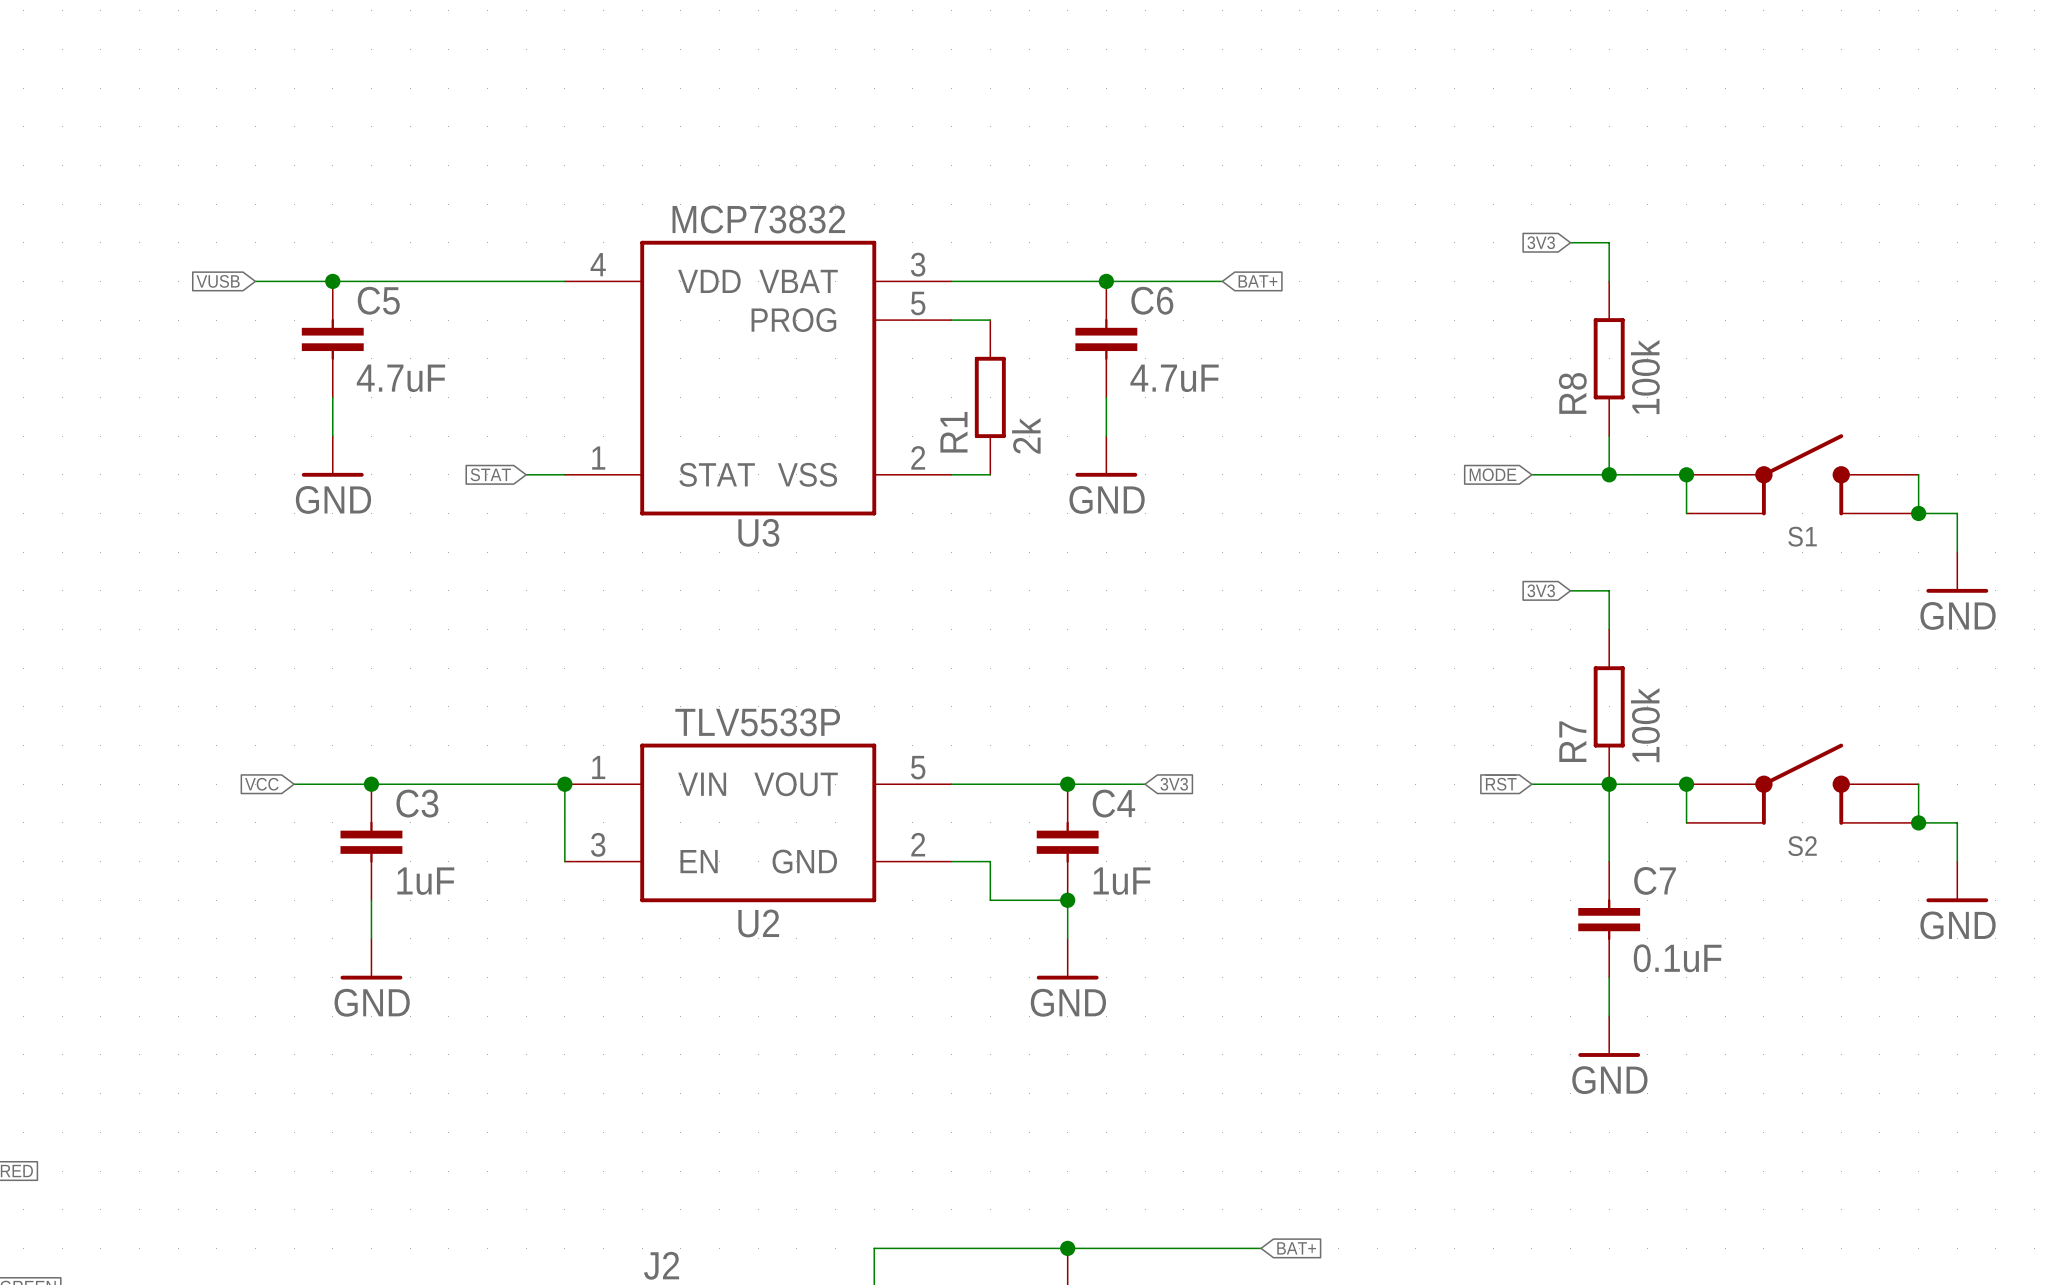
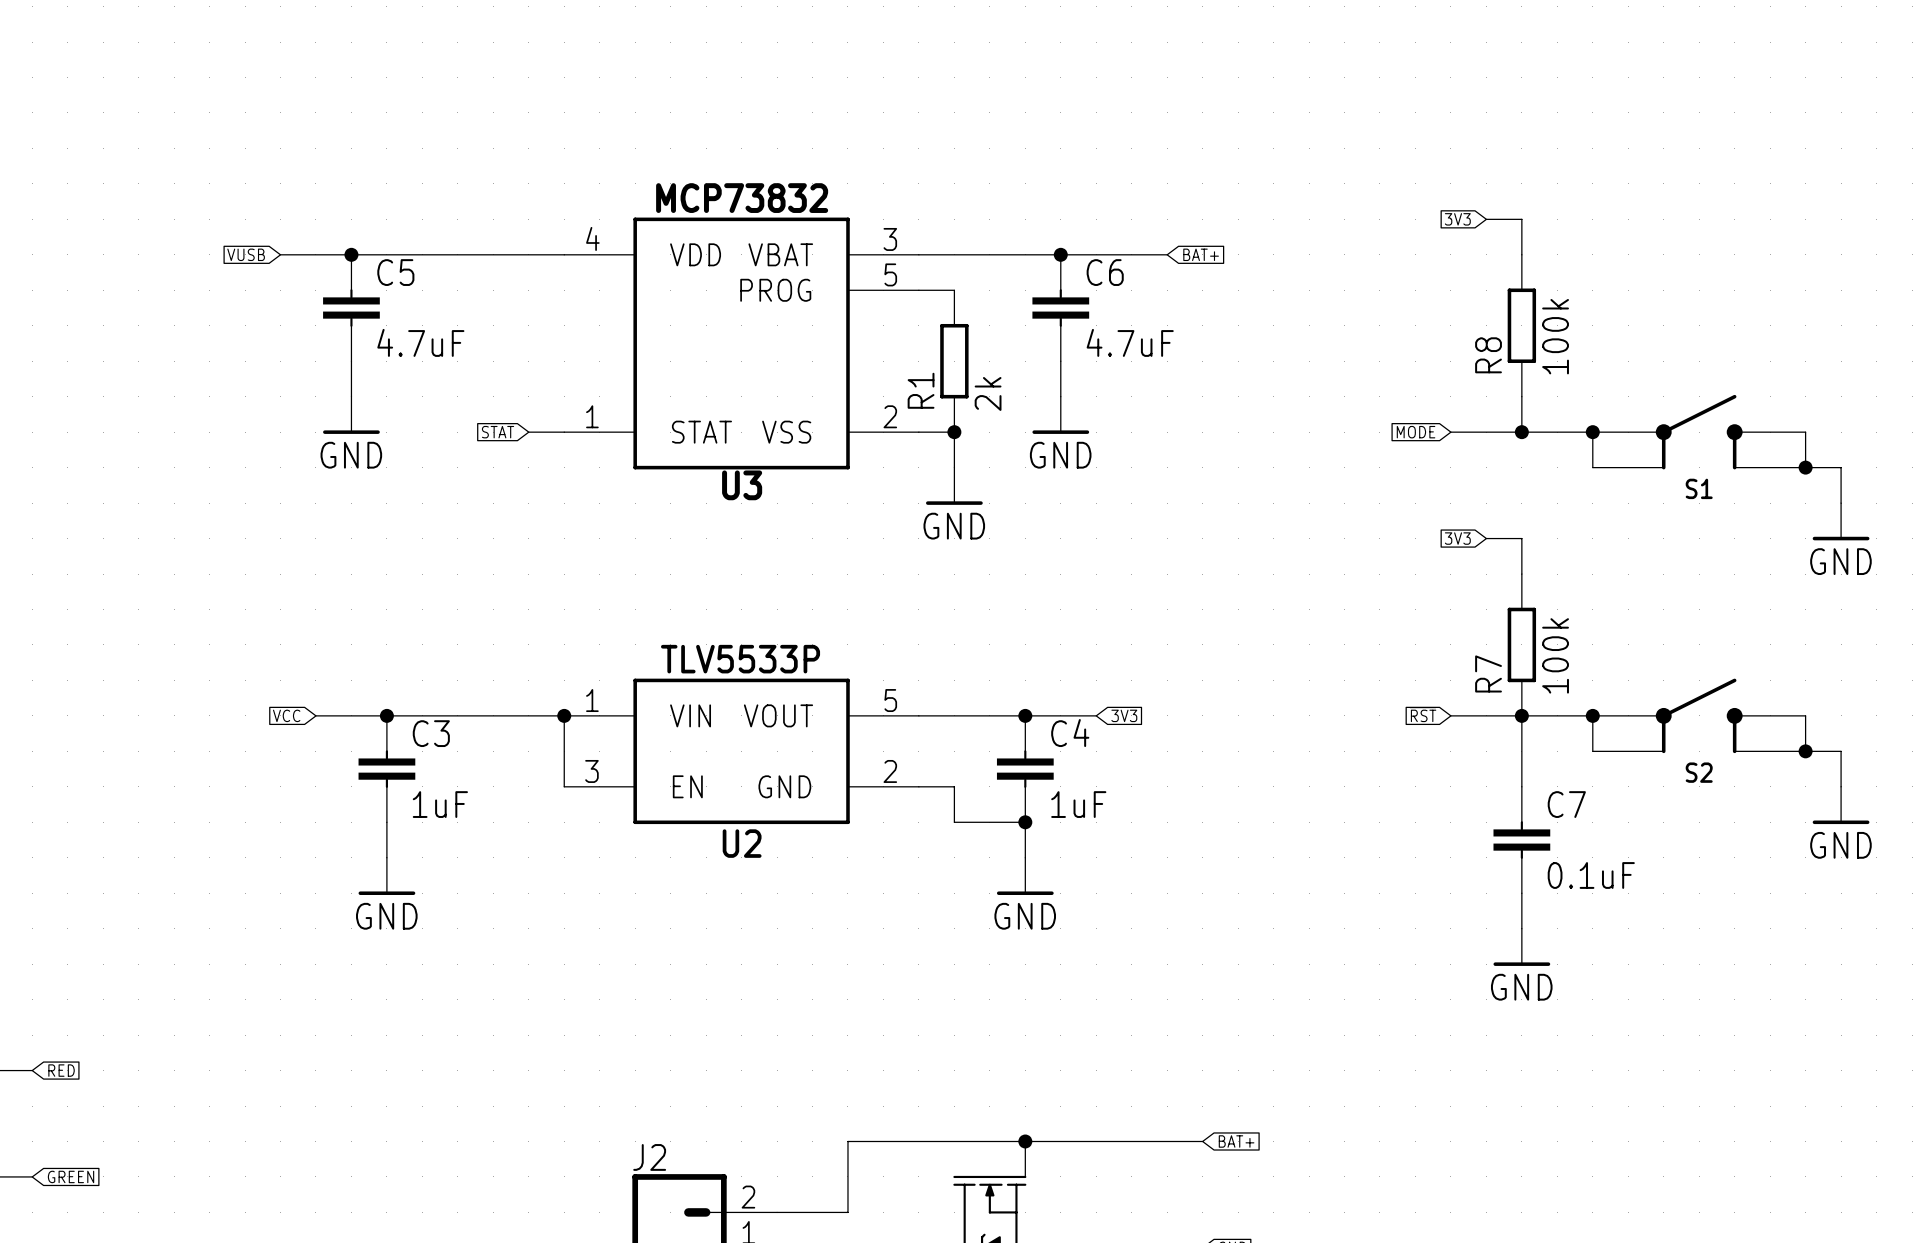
wire: none -> (954, 432) (954, 467)
junction: none -> (954, 432)
power symbol: none -> GND (954, 486)

